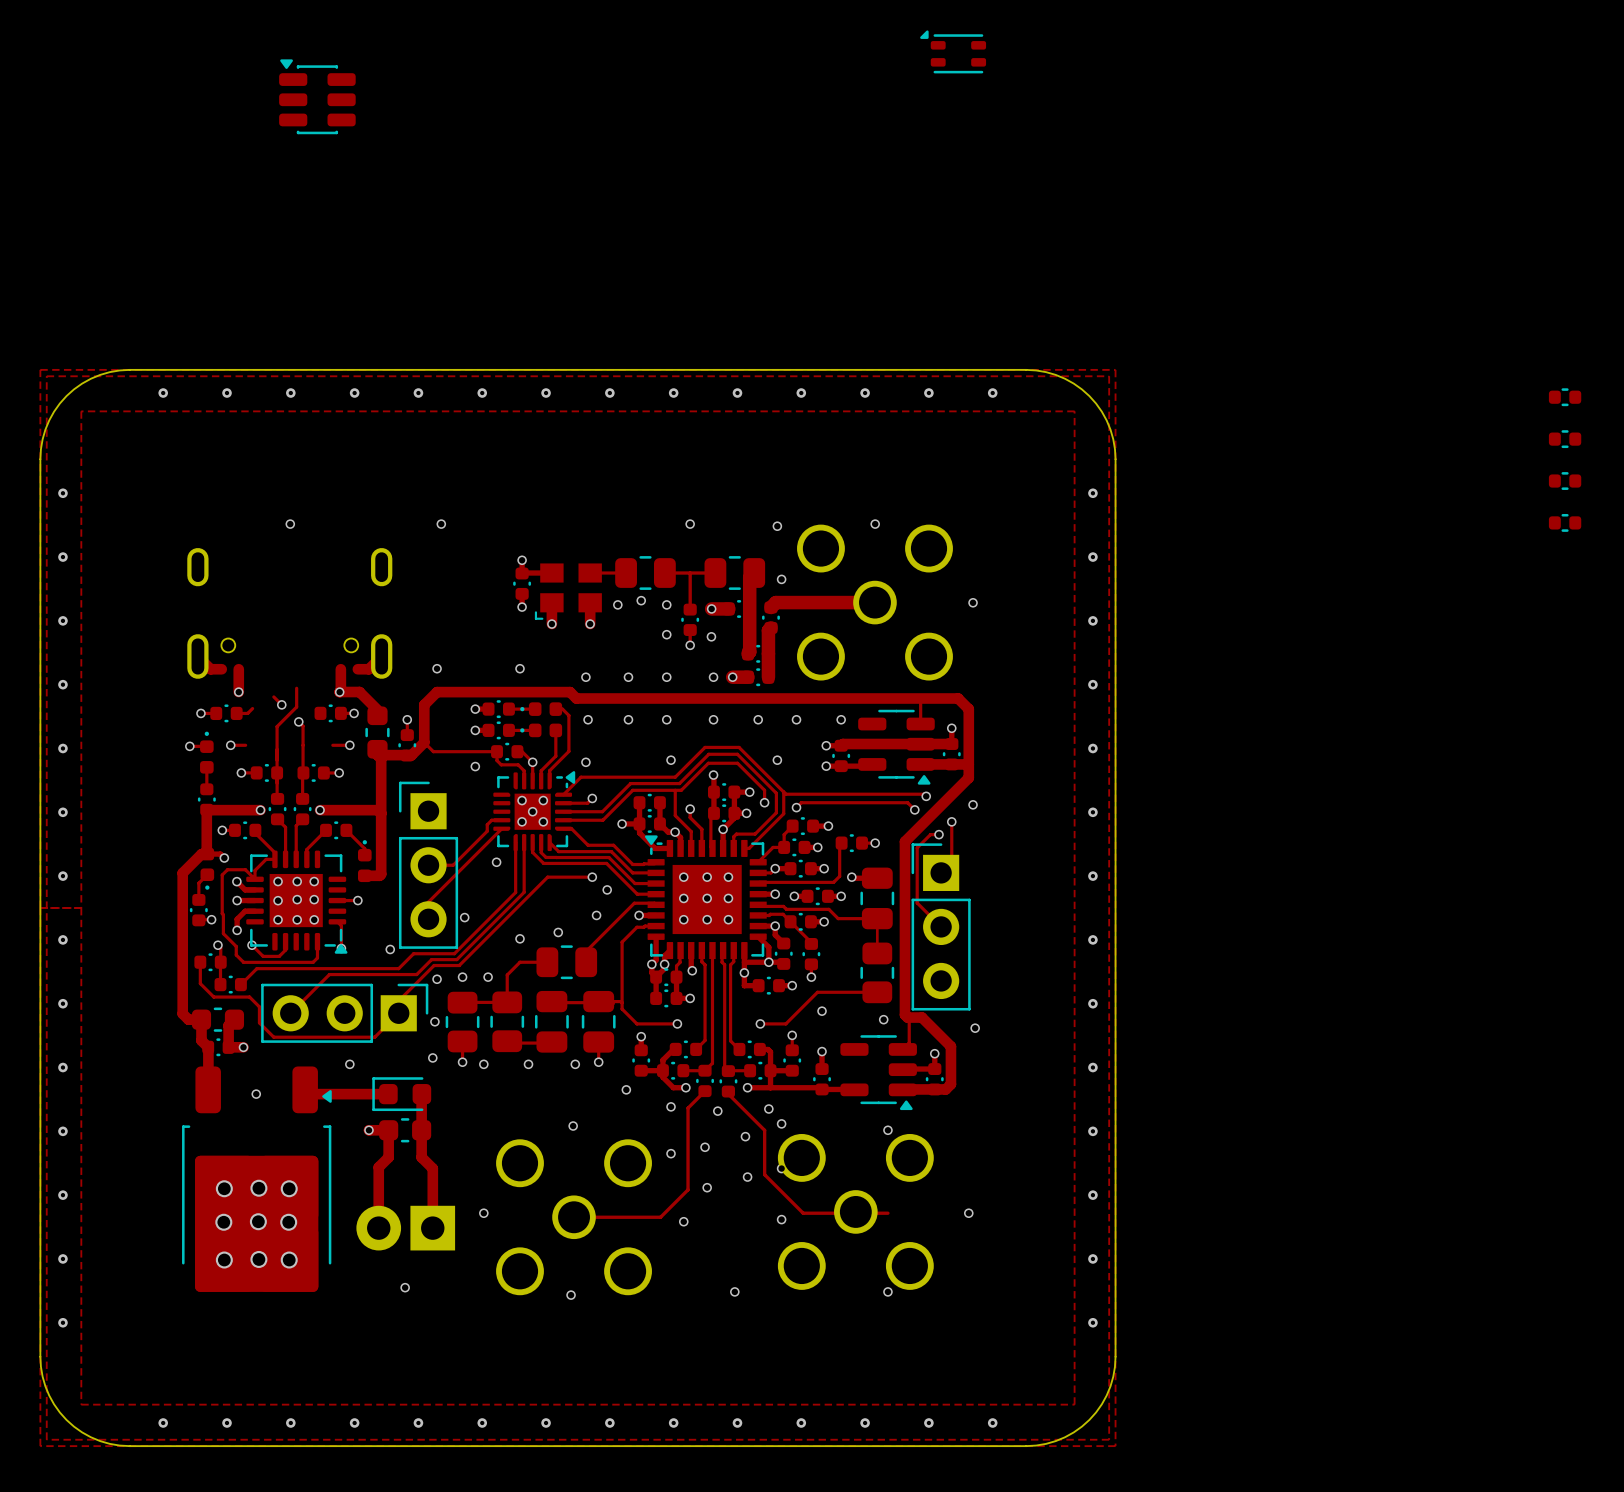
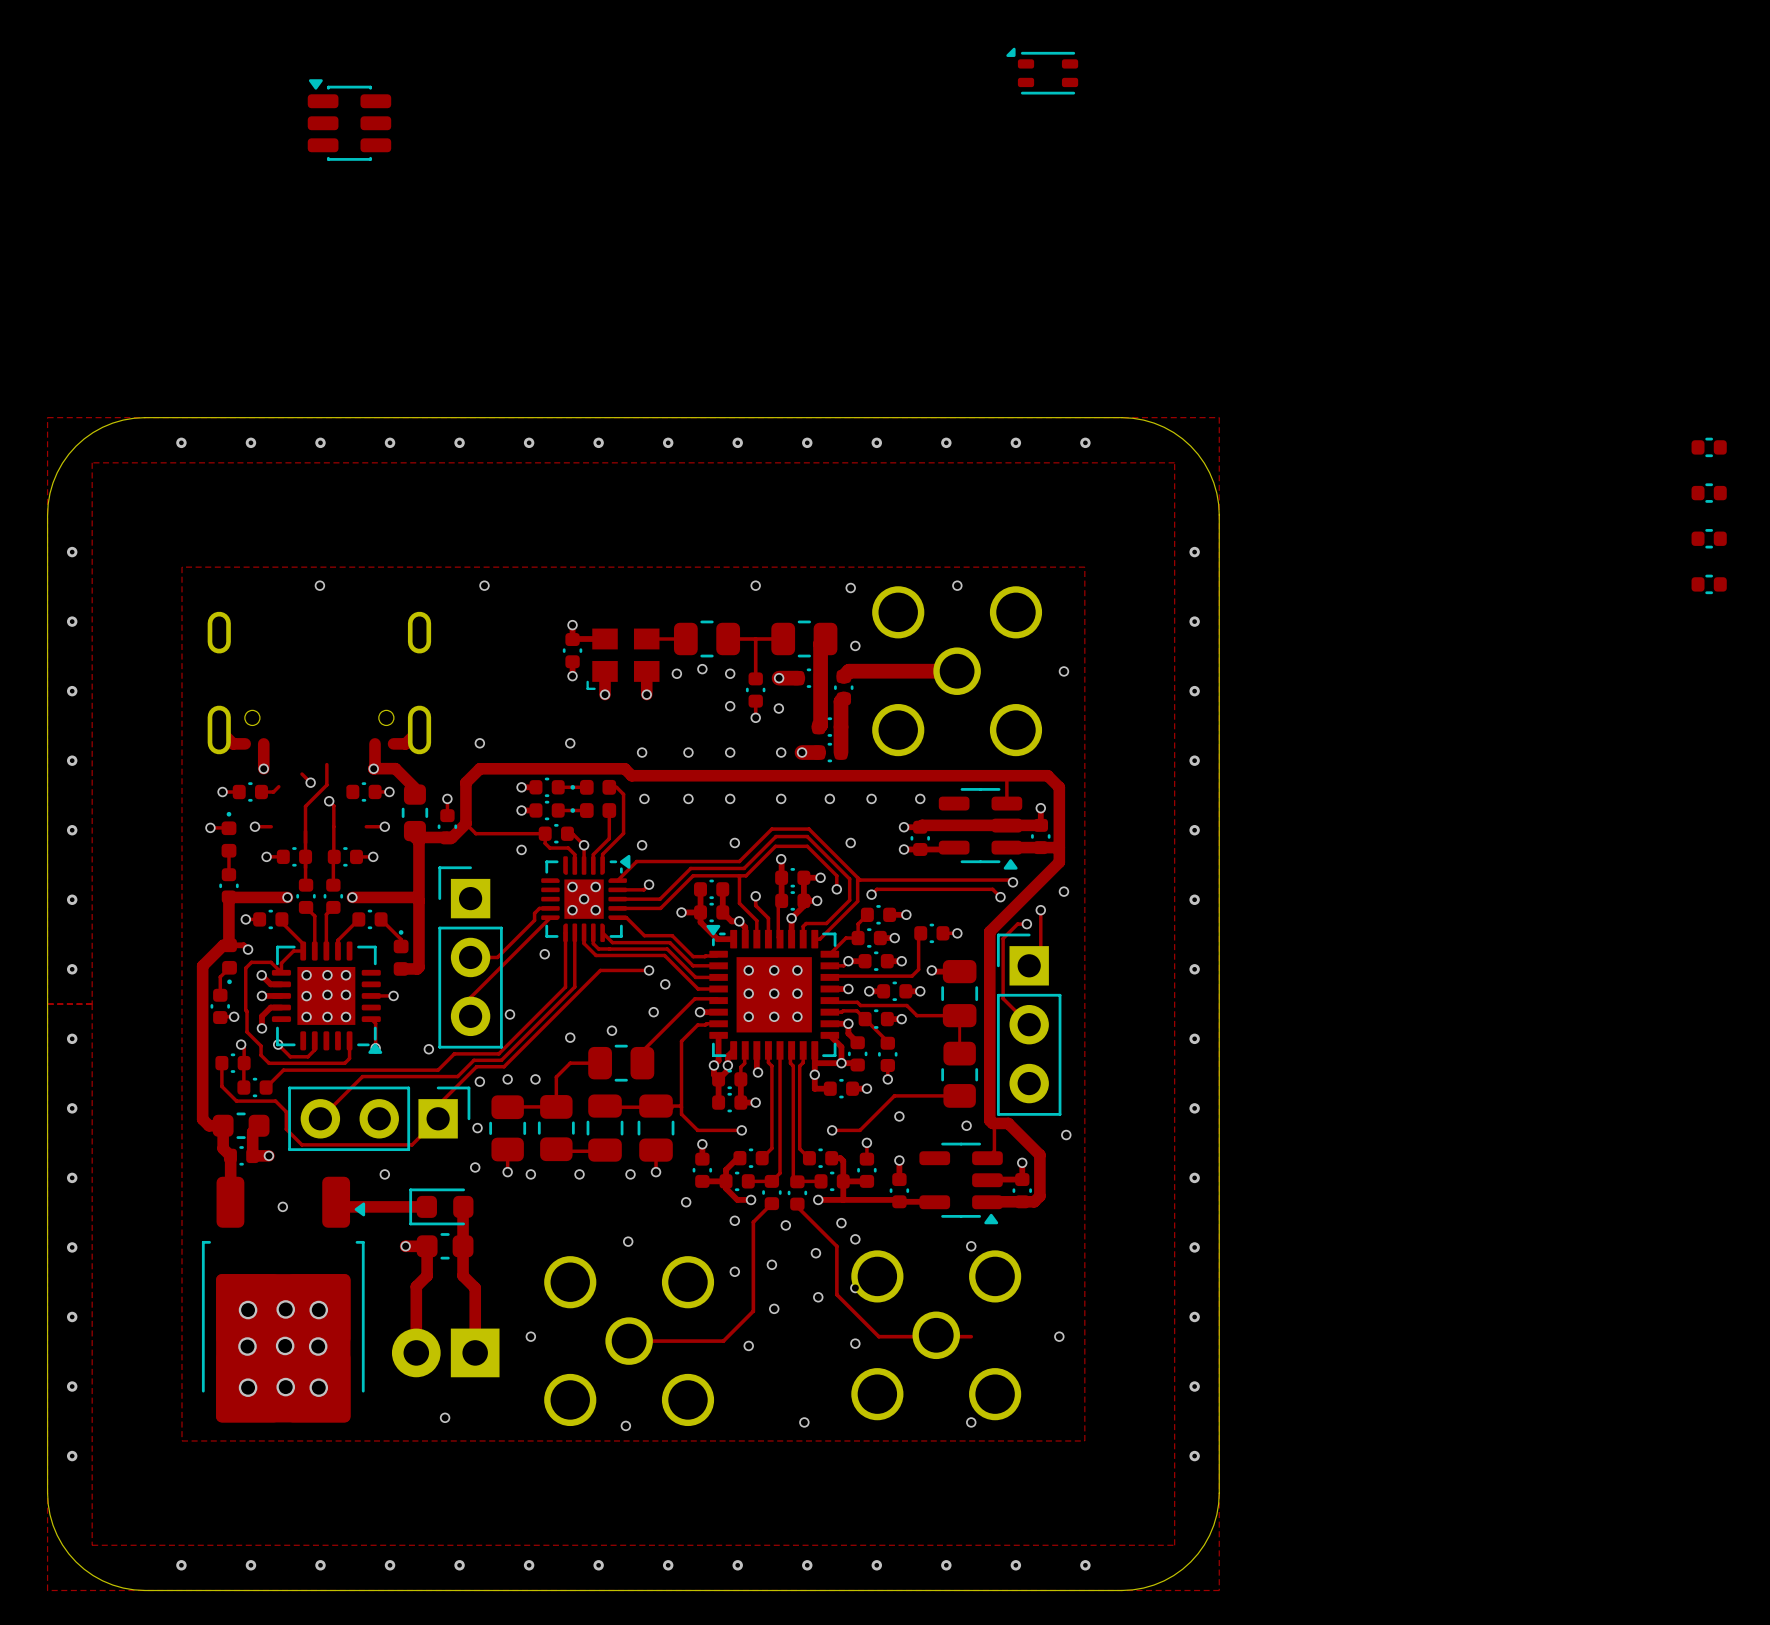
zone outline: (46, 376) (1109, 376) (1109, 1439) (46, 1439) (46, 376) -> (182, 567) (182, 1440) (1084, 1440) (1084, 567) (182, 567)

